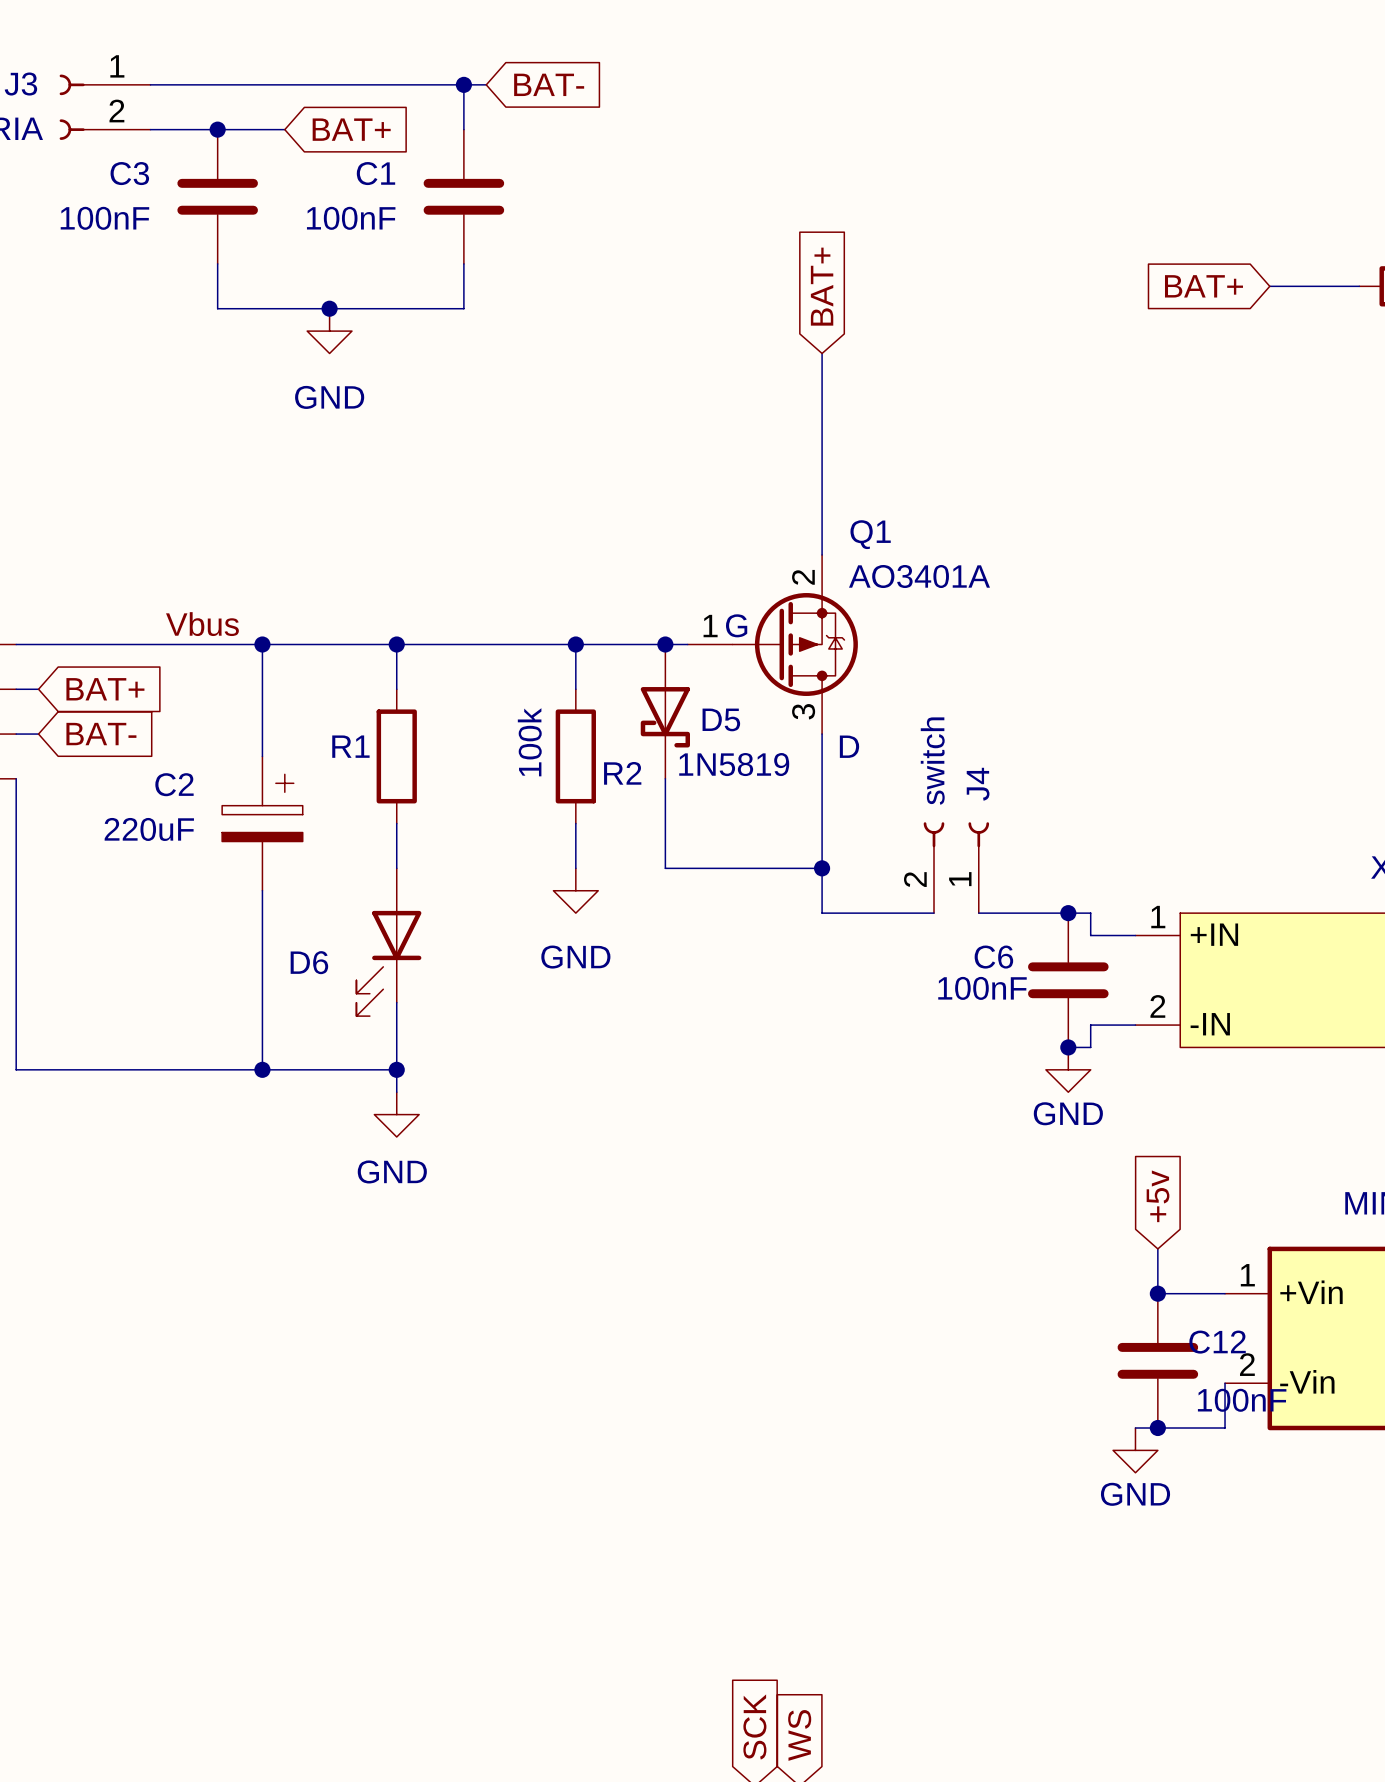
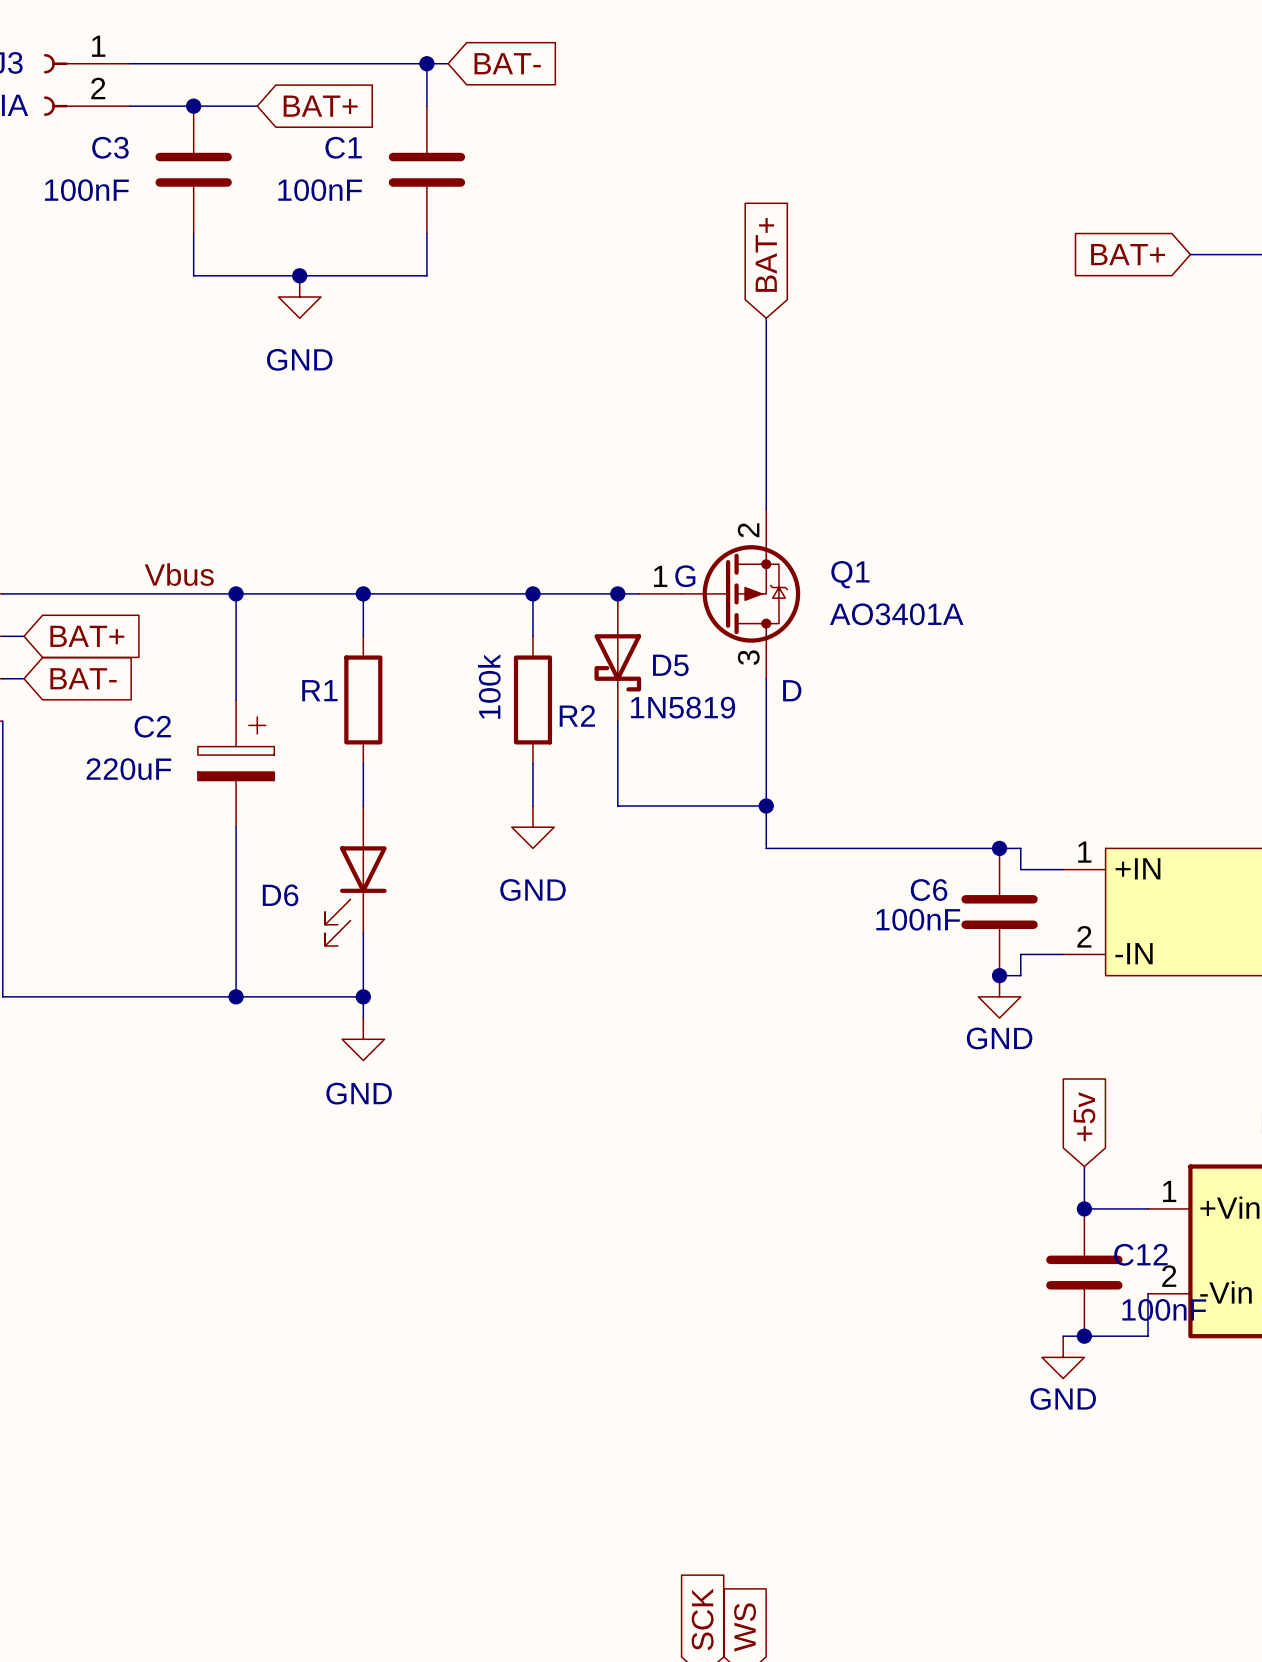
Q1 name position: Q1 (870, 534) -> Q1 (850, 574)
Q1 value position: AO3401A (919, 576) -> AO3401A (896, 614)
J4: switch (956, 867) -> none
wire: none -> (872, 848) (914, 848)

